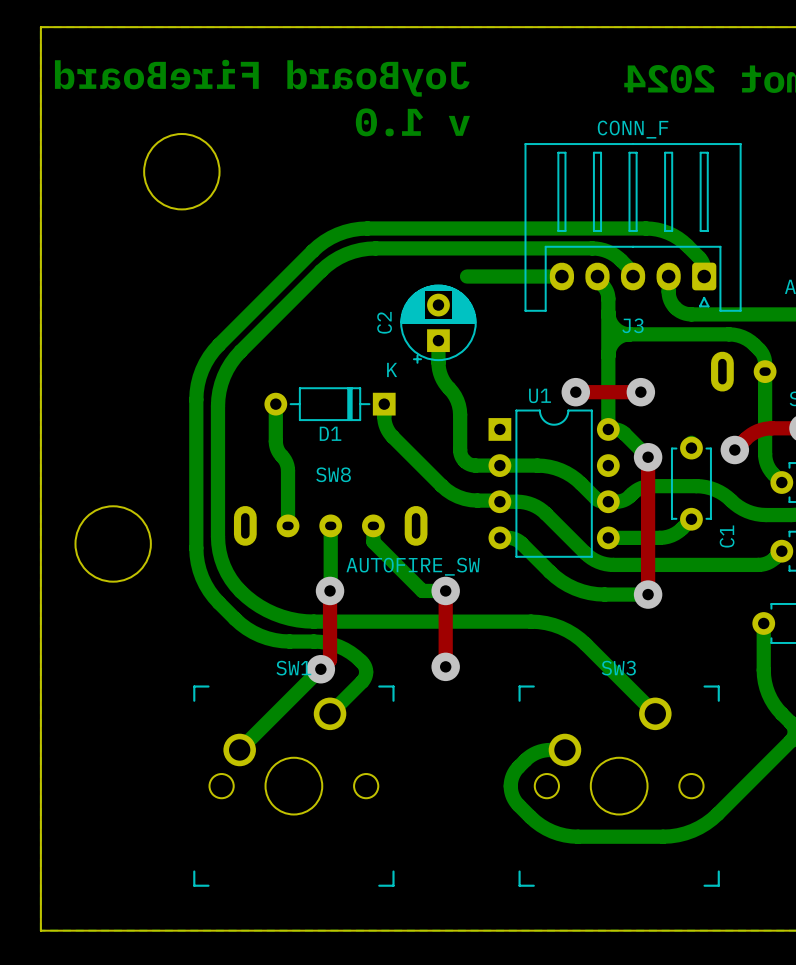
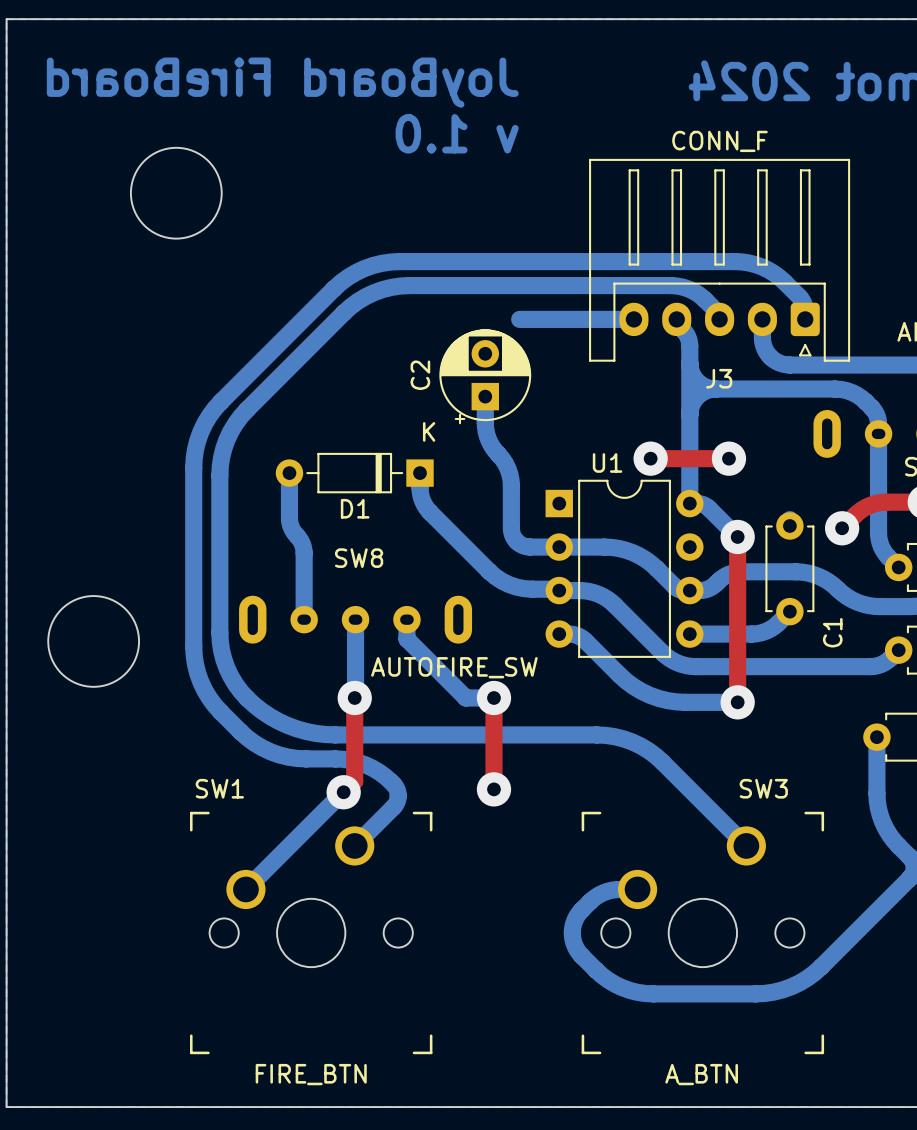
SW1 name position: SW1 (293, 668) -> SW1 (219, 788)
SW3 name position: SW3 (618, 668) -> SW3 (763, 788)
SW1 value: none -> FIRE_BTN (311, 1074)
SW3 value: none -> A_BTN (701, 1074)

